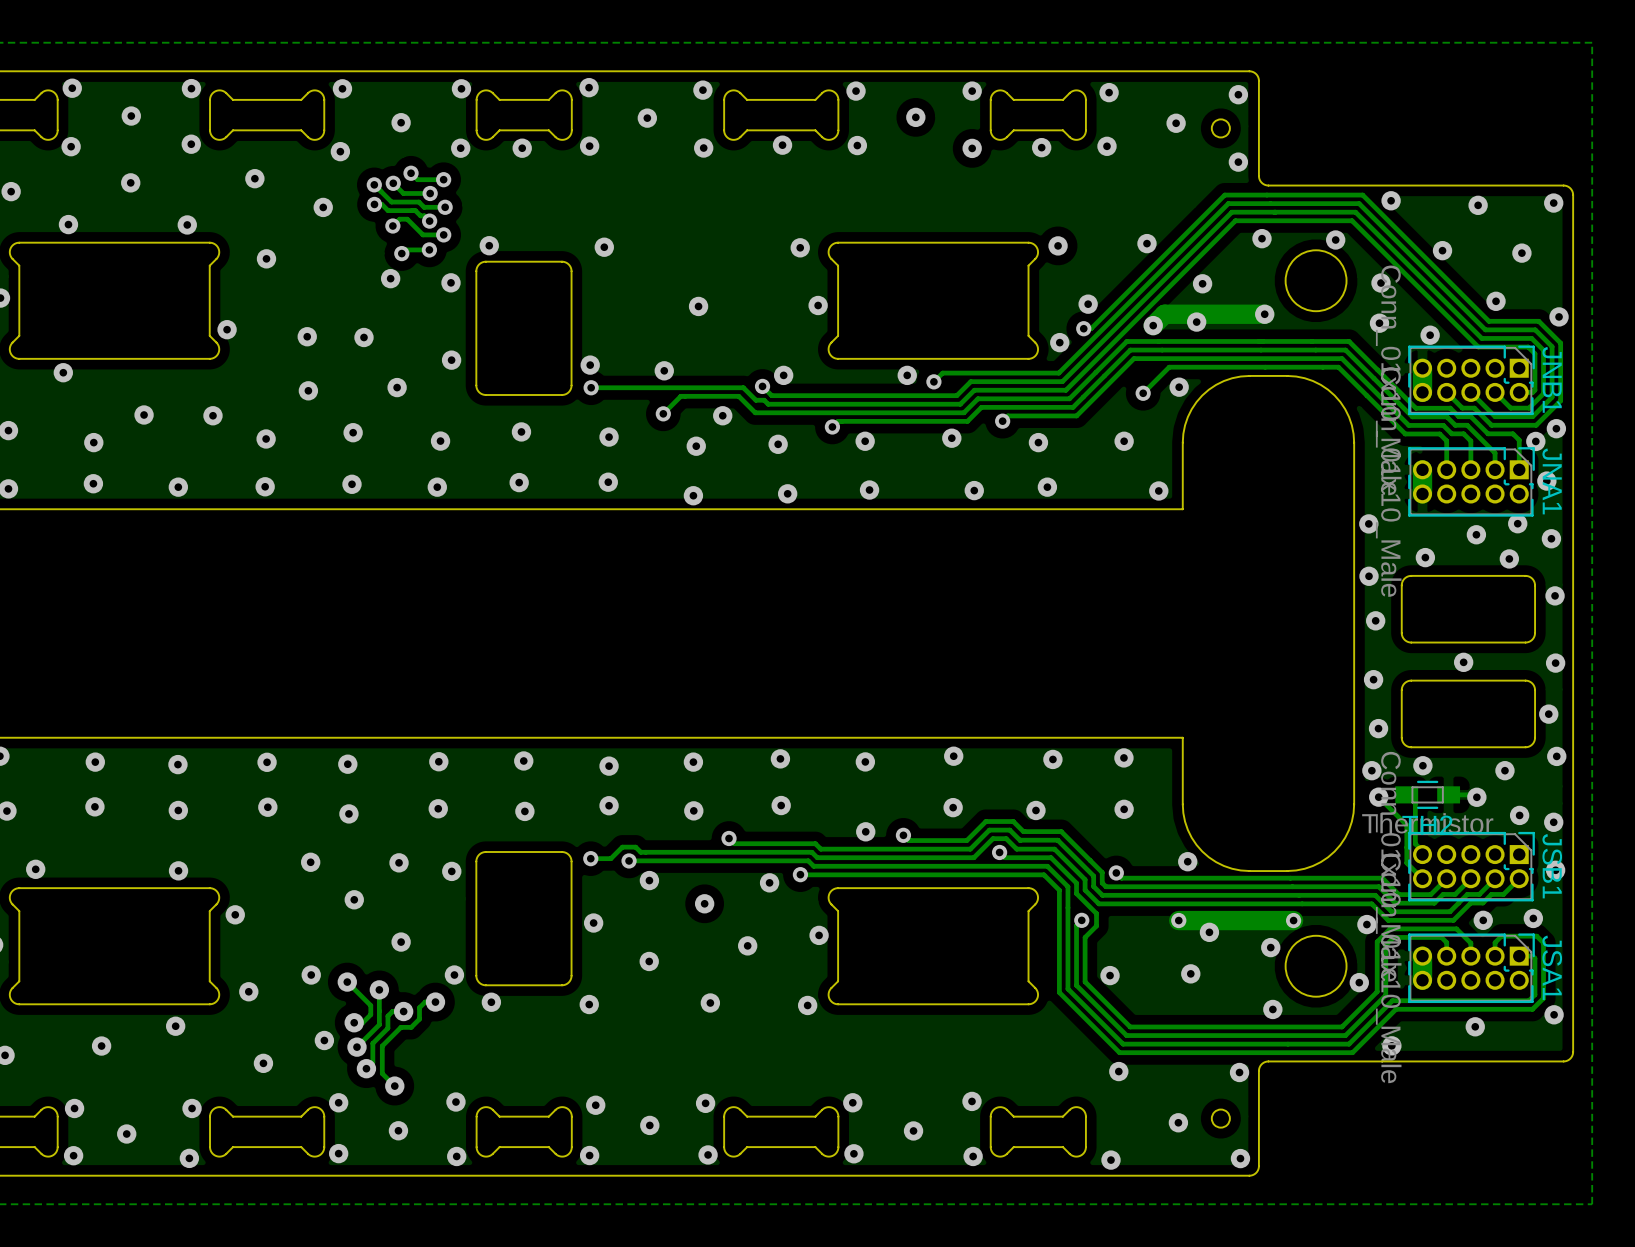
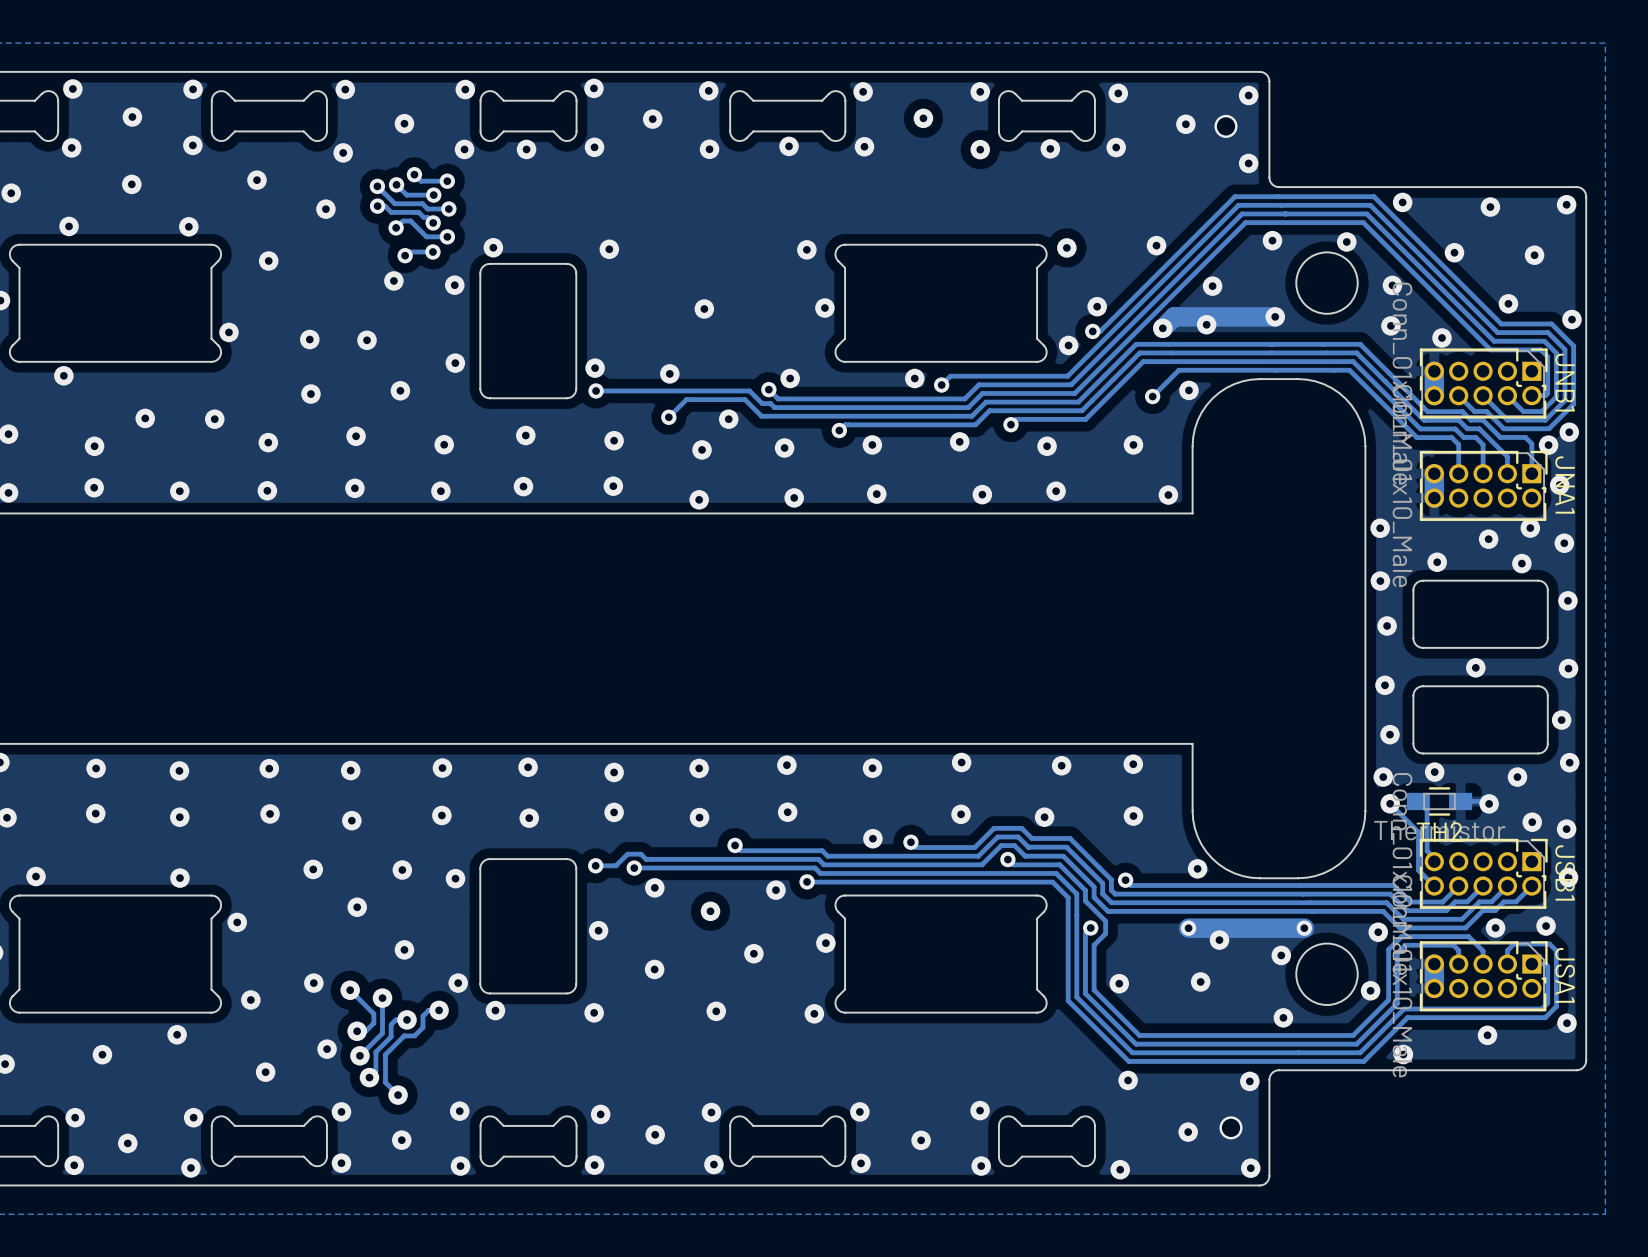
round board edge: [1210, 118, 1231, 139] -> none
via: none -> (1226, 126)
round board edge: [1210, 1108, 1231, 1129] -> none
via: none -> (1231, 1127)

